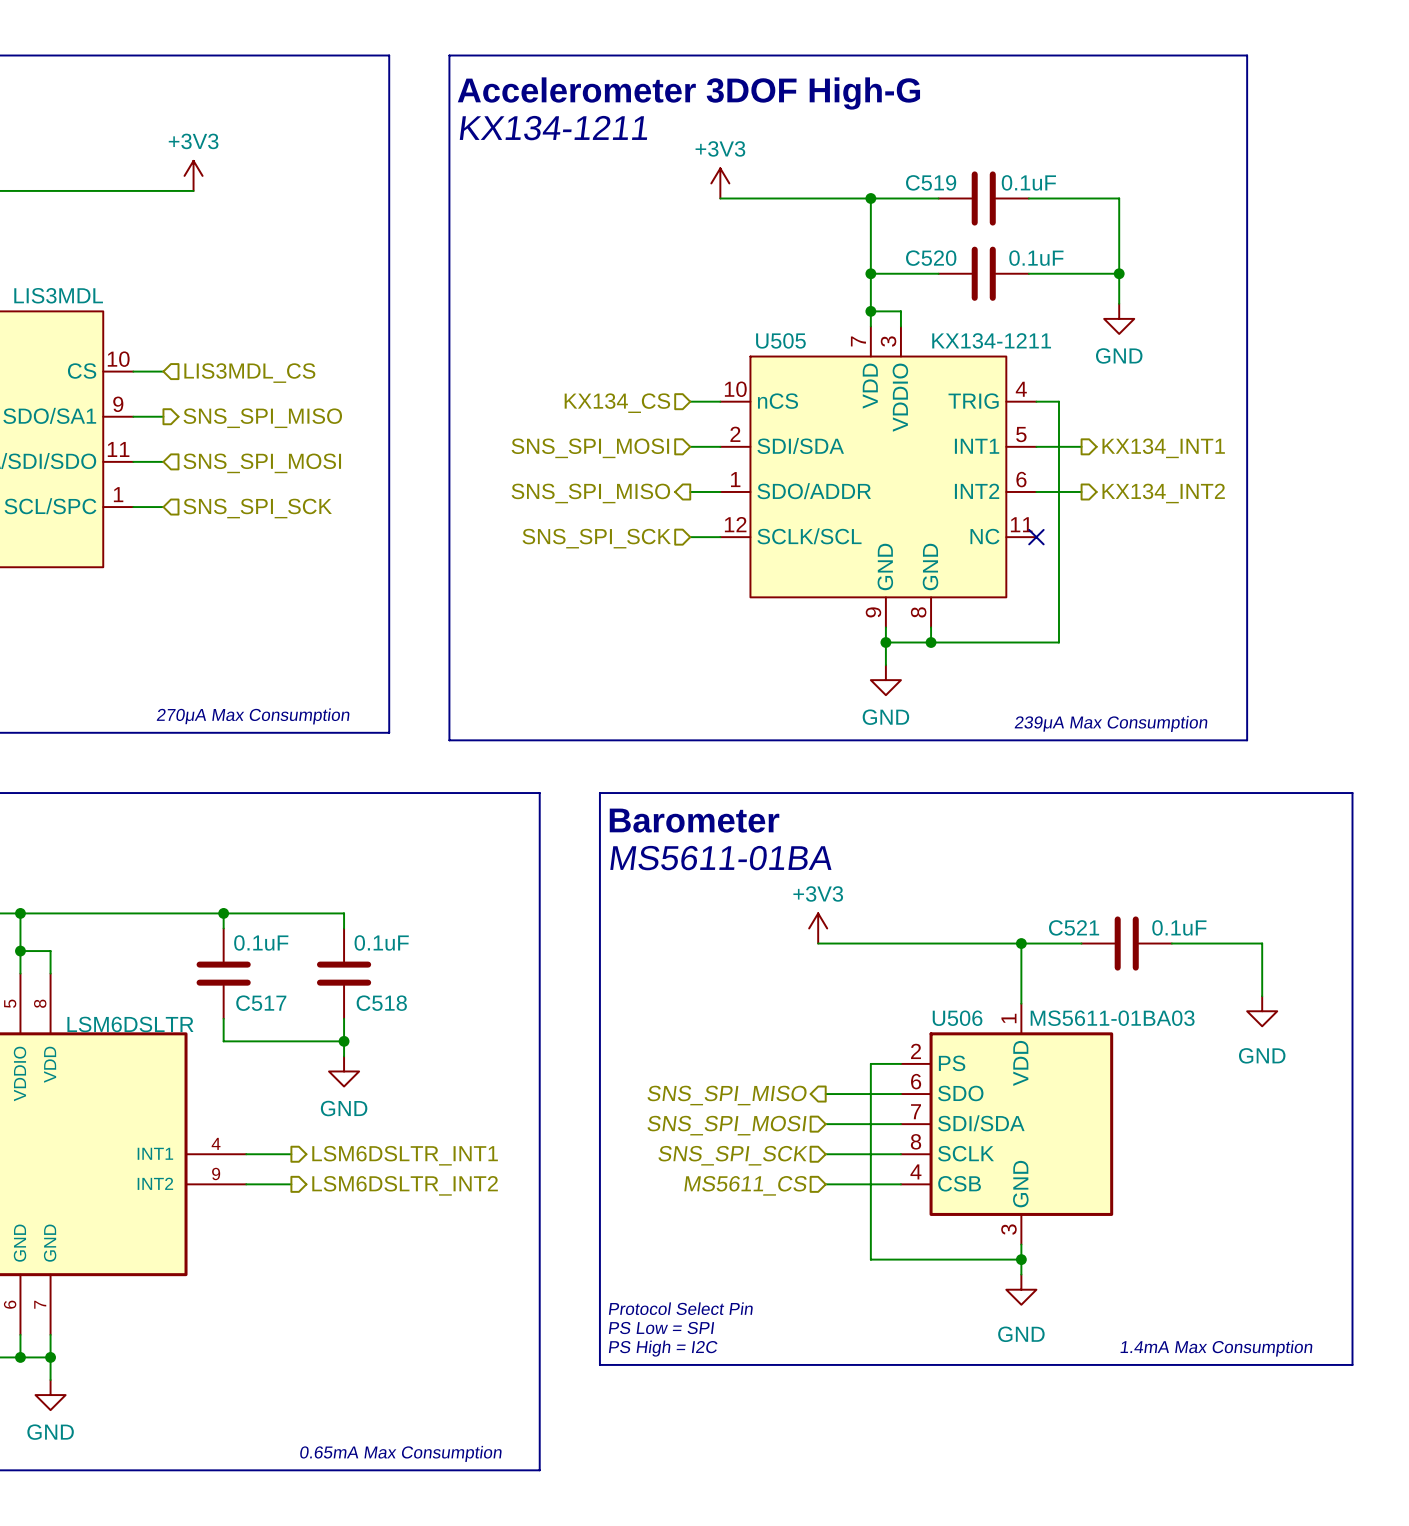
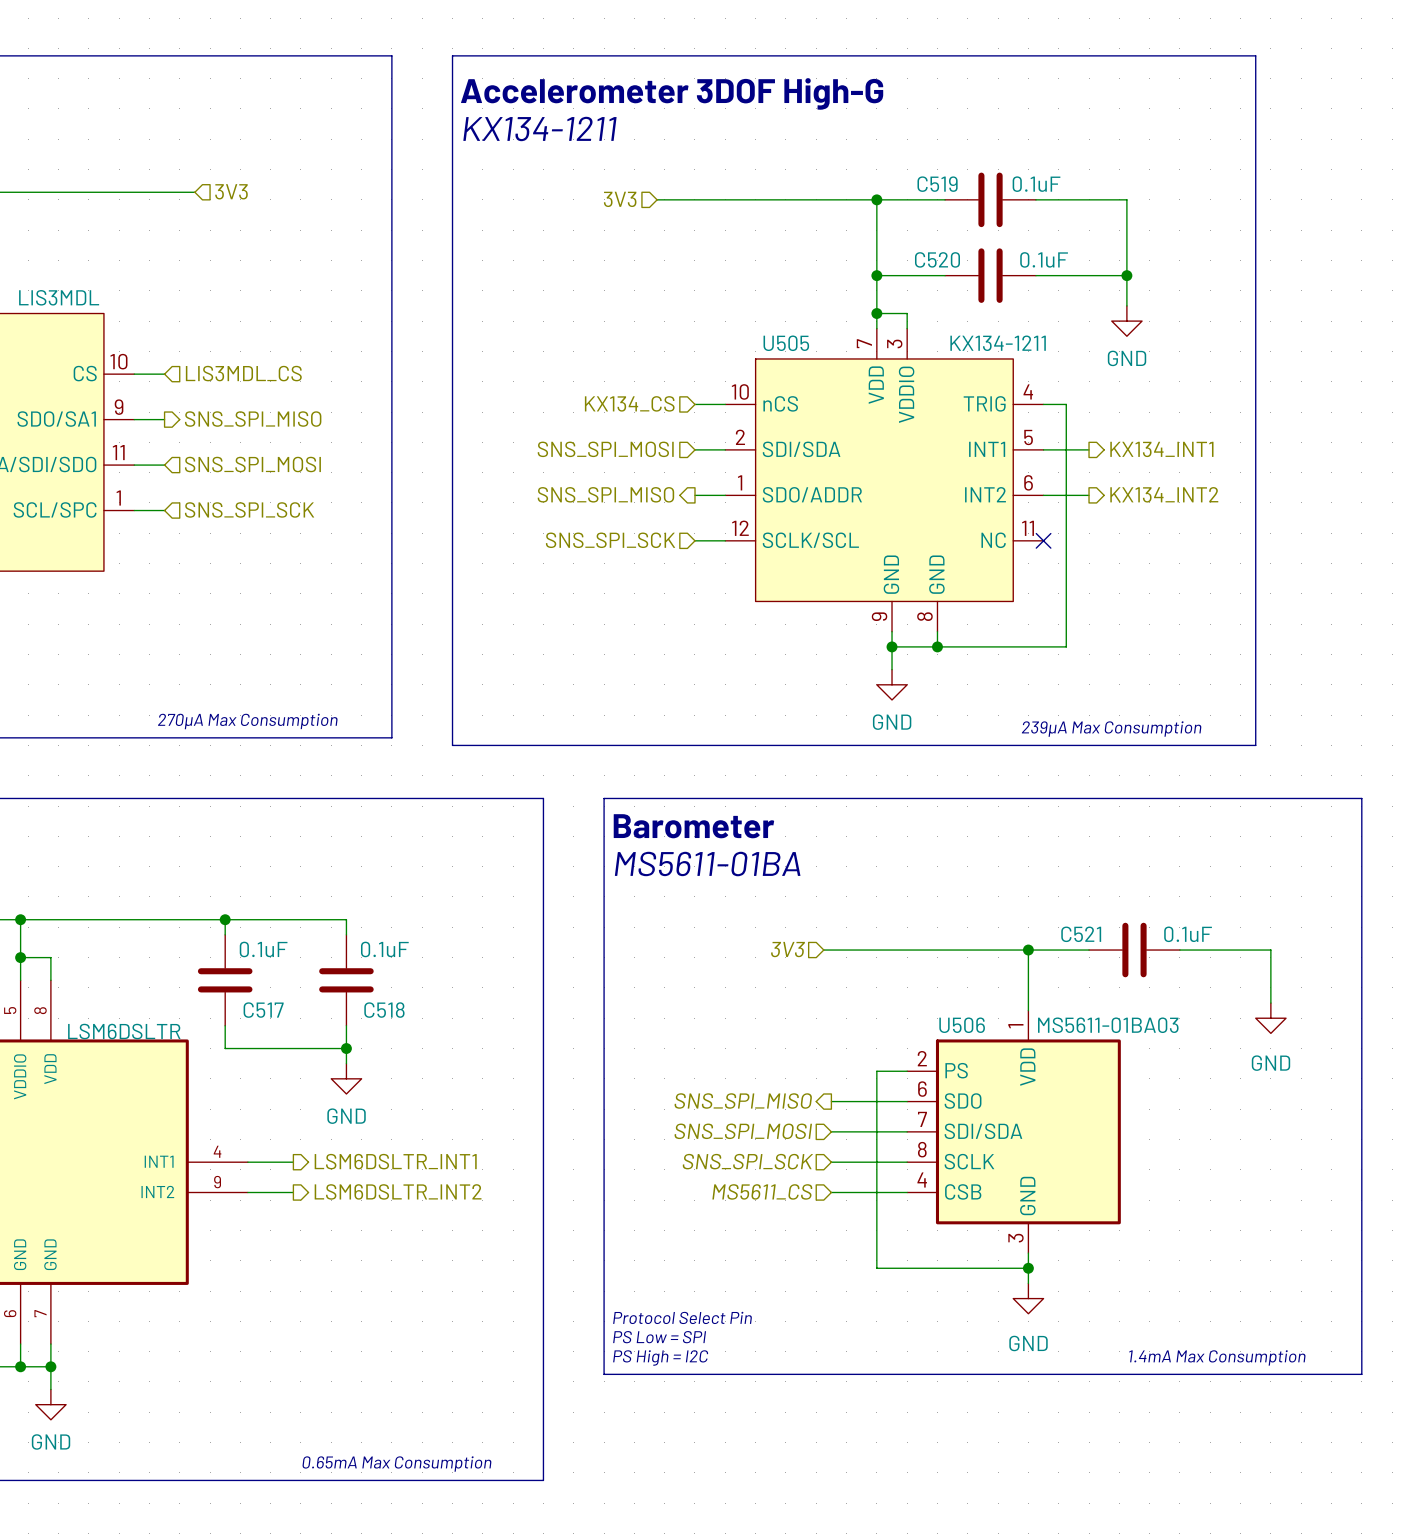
power symbol: +3V3 (193, 175) -> none
power symbol: +3V3 (720, 183) -> none
hierarchical label: none -> 3V3 (231, 191)
hierarchical label: none -> 3V3 (620, 199)
wire: none -> (657, 199) (725, 199)
power symbol: +3V3 (818, 928) -> none
hierarchical label: none -> 3V3 (788, 949)

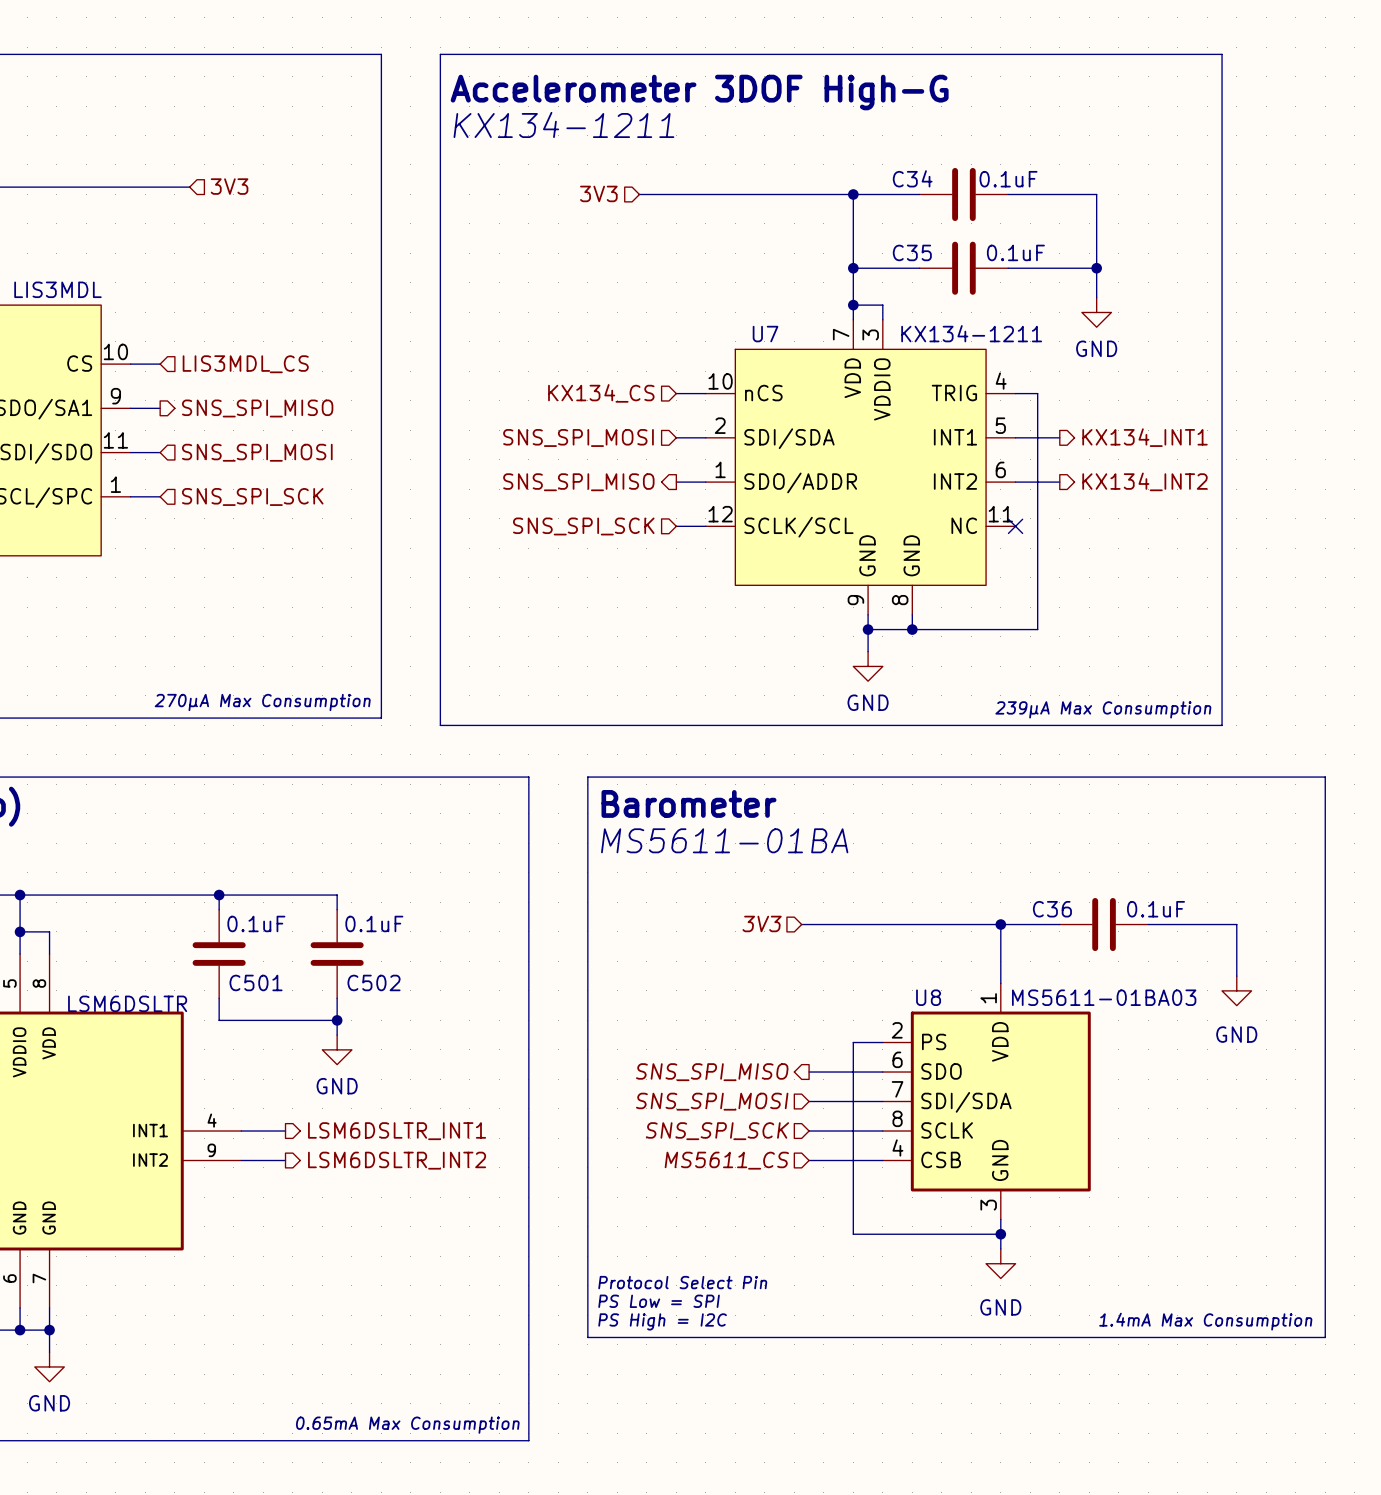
C519 name: C519 (937, 184) -> C34 (912, 178)
C520 name: C520 (937, 259) -> C35 (912, 252)
U505 name: U505 (786, 343) -> U7 (765, 334)
C521 name: C521 (1081, 934) -> C36 (1052, 909)
C517 name: C517 (263, 1010) -> C501 (256, 982)
C518 name: C518 (384, 1010) -> C502 (374, 982)
U506 name: U506 (962, 1025) -> U8 (928, 997)

